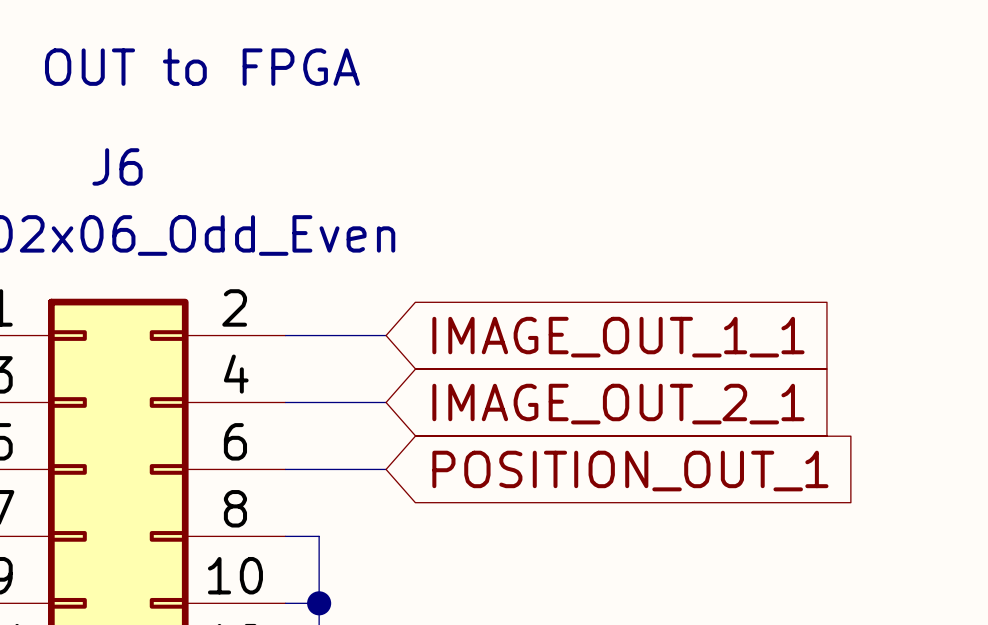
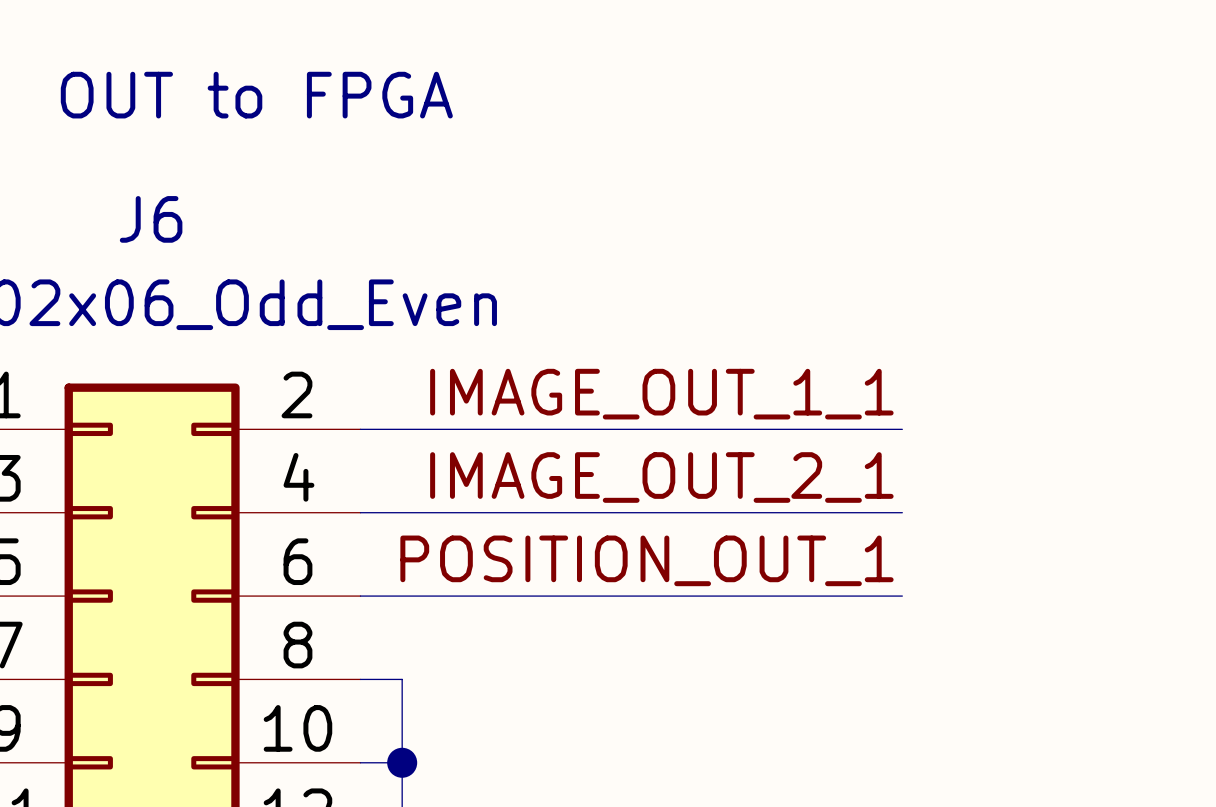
label: none -> IMAGE_OUT_1_1 (661, 394)
wire: none -> (485, 429) (902, 429)
global label: IMAGE_OUT_1_1 (618, 337) -> none
label: none -> IMAGE_OUT_2_1 (661, 477)
wire: none -> (485, 512) (902, 512)
global label: IMAGE_OUT_2_1 (618, 404) -> none
label: none -> POSITION_OUT_1 (646, 560)
wire: none -> (485, 596) (902, 596)
global label: POSITION_OUT_1 (630, 471) -> none

